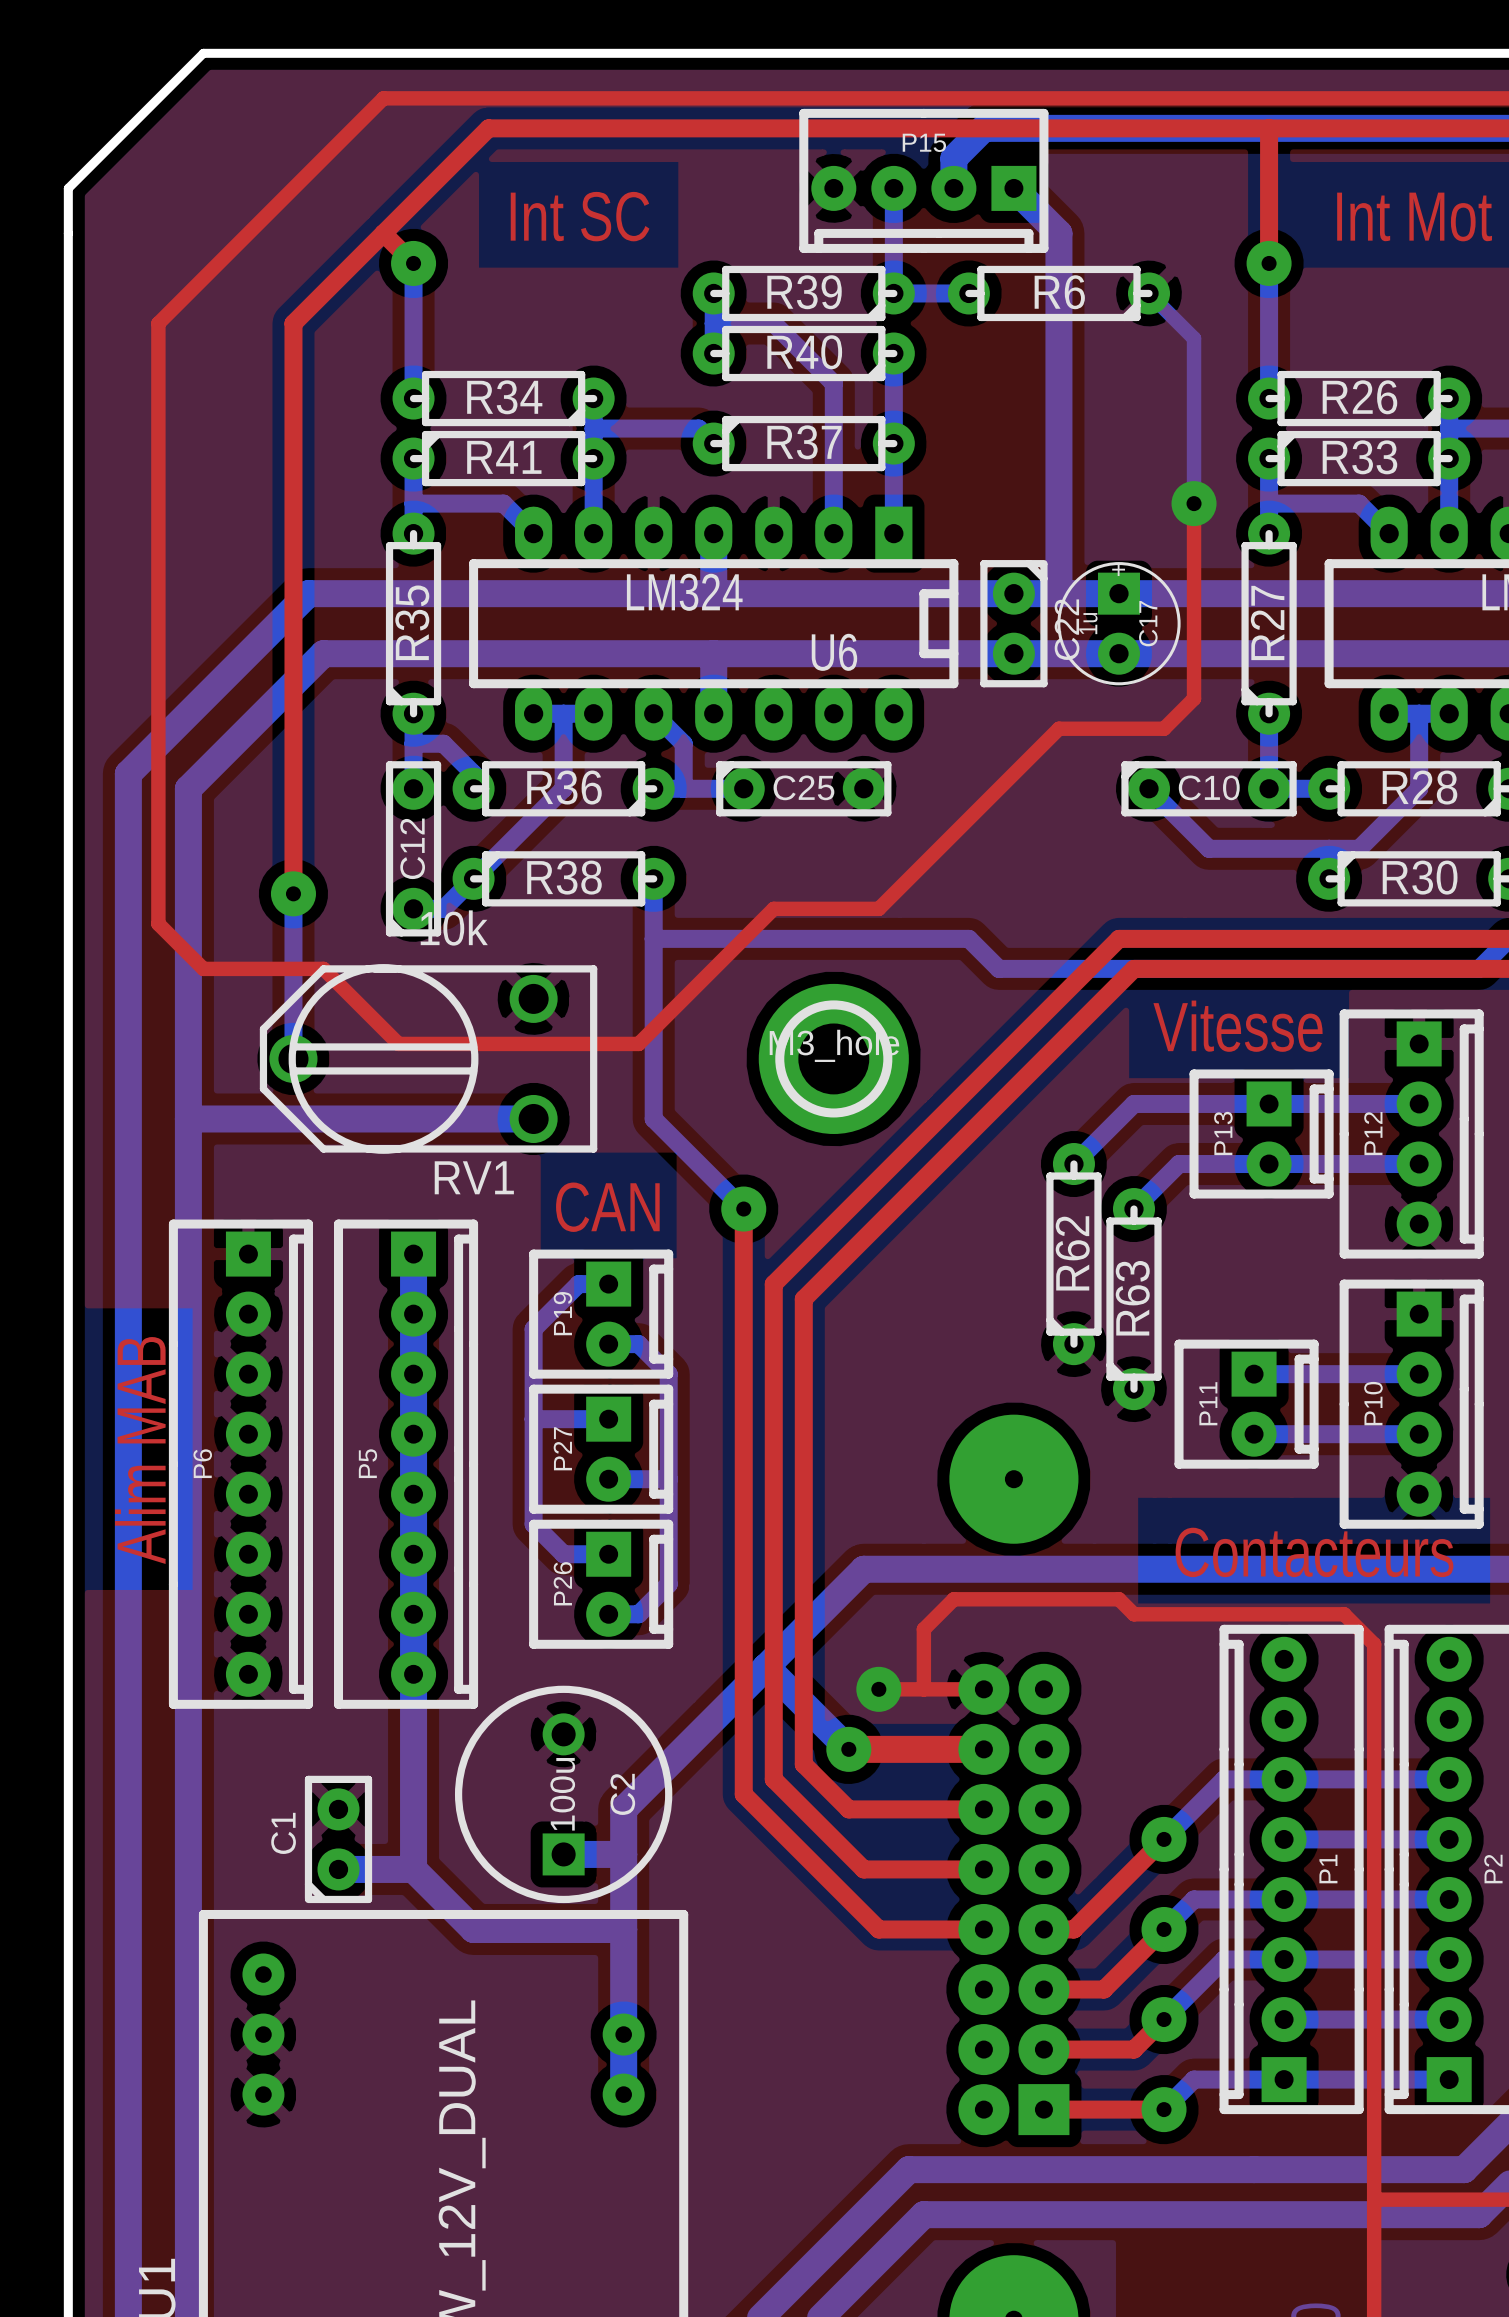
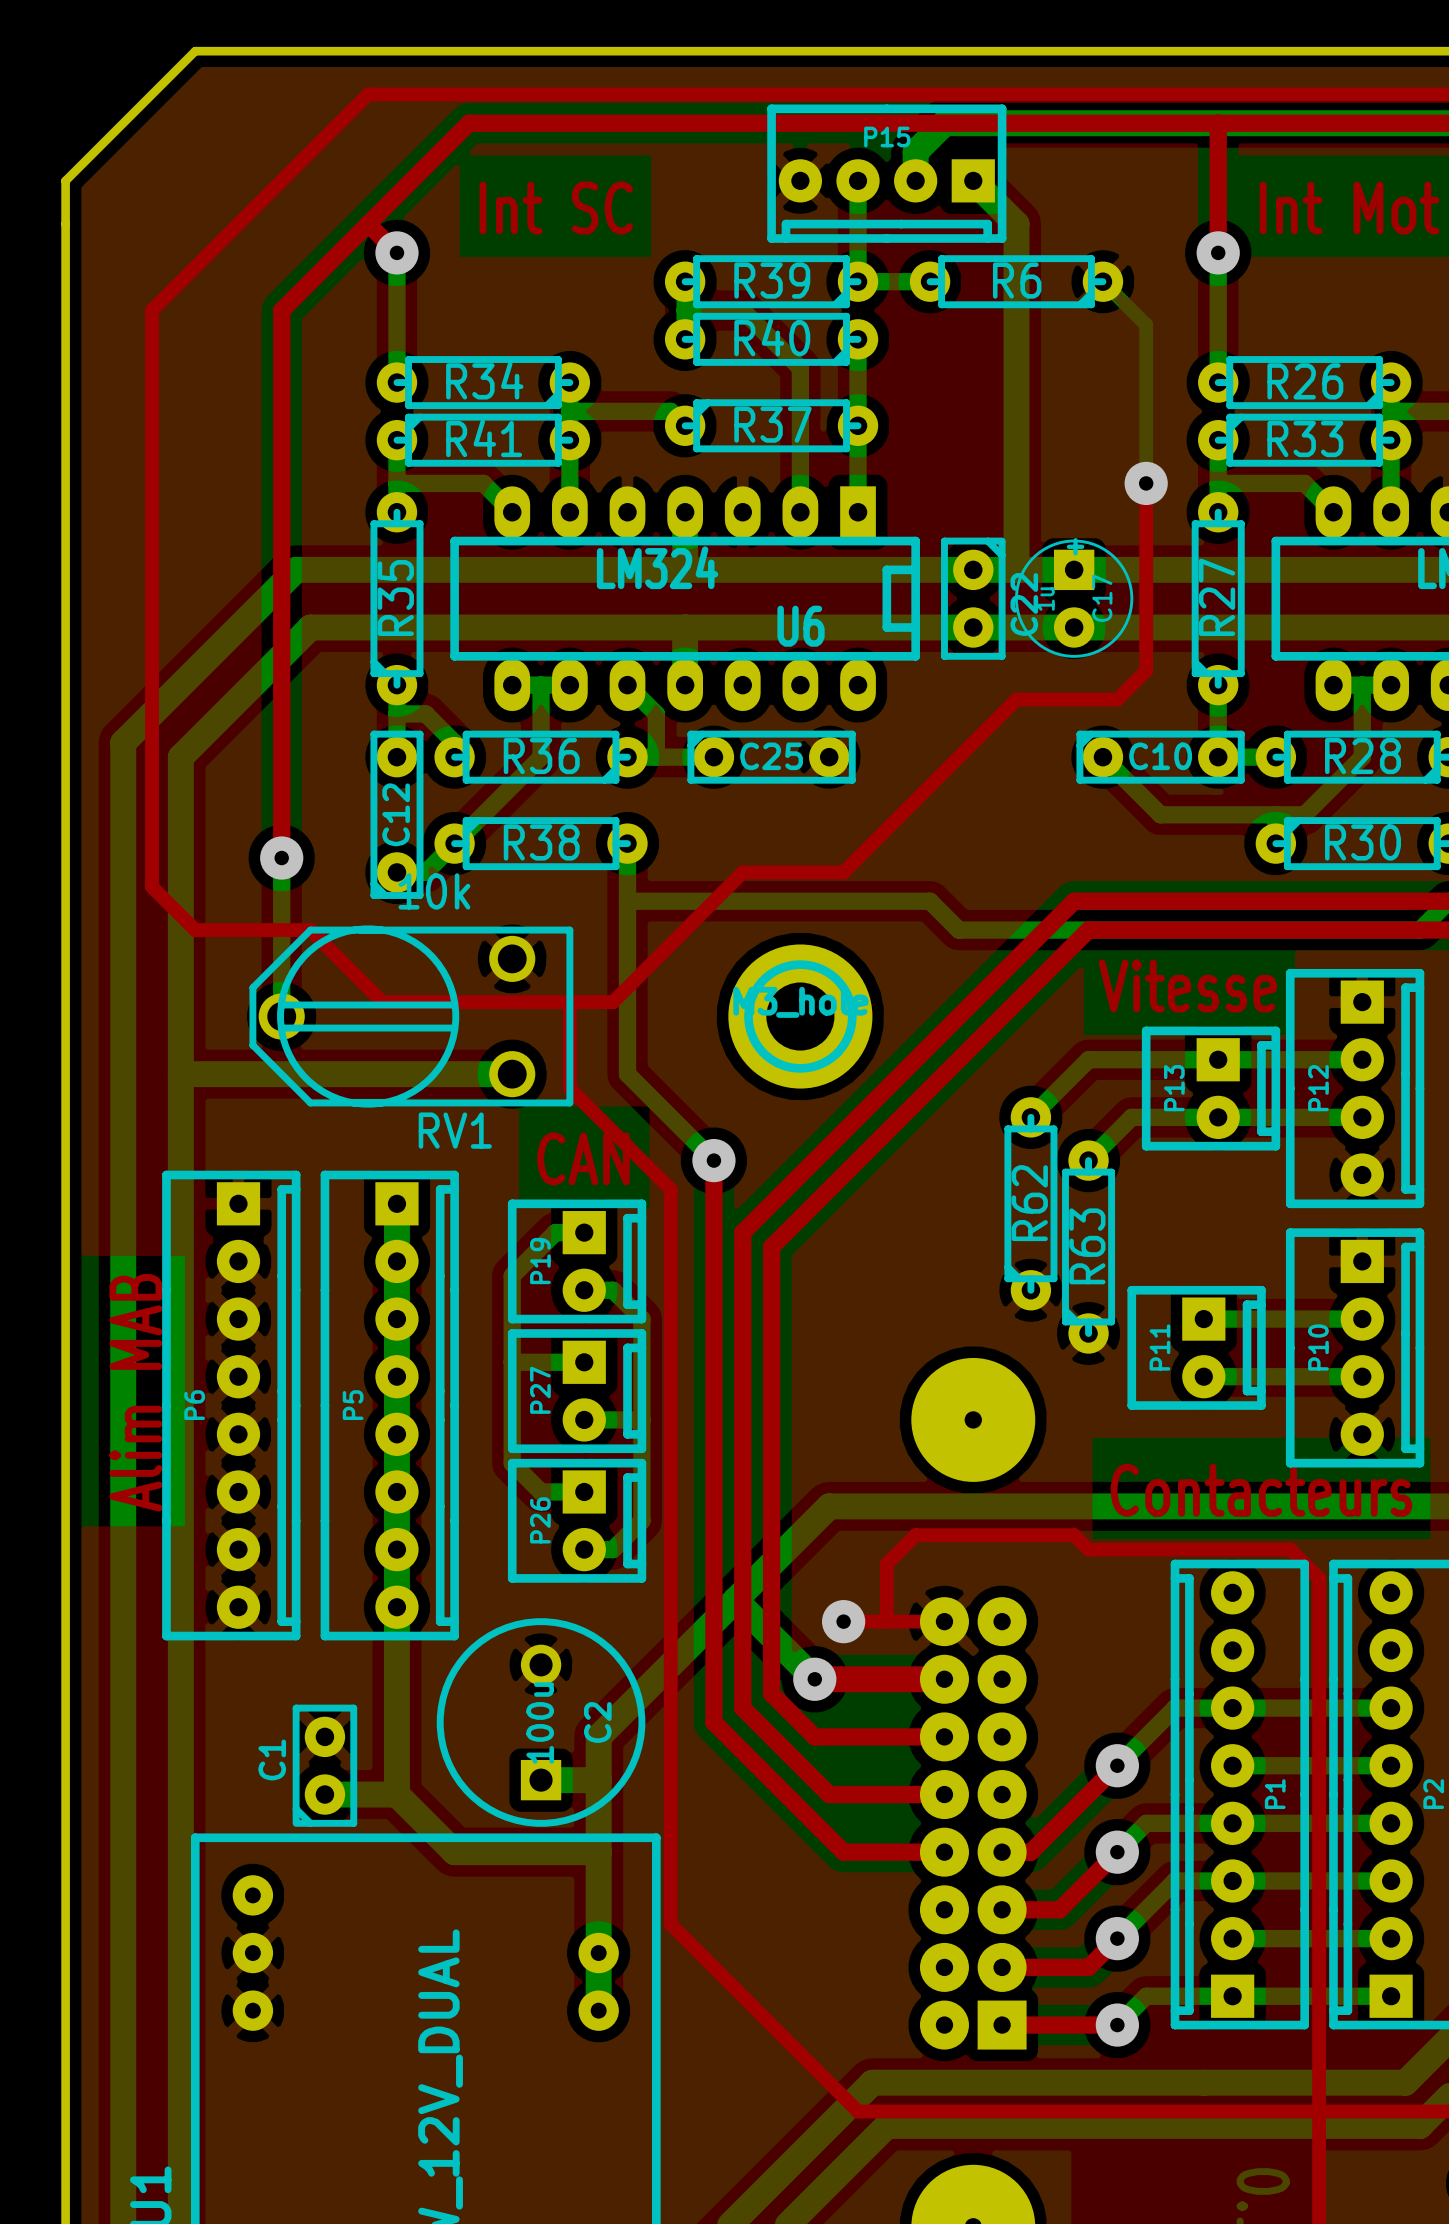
top track: none -> (569, 1002) (569, 1088) (670, 1189) (670, 1924) (858, 2111) (1319, 2111)

